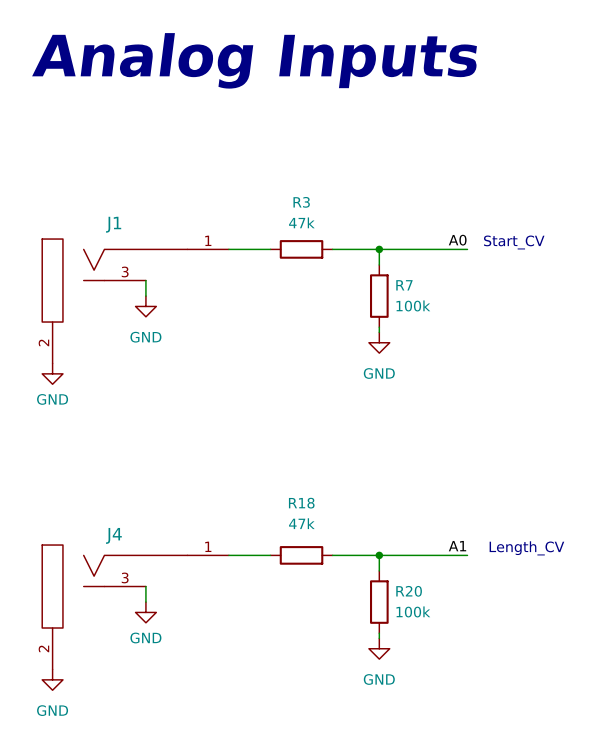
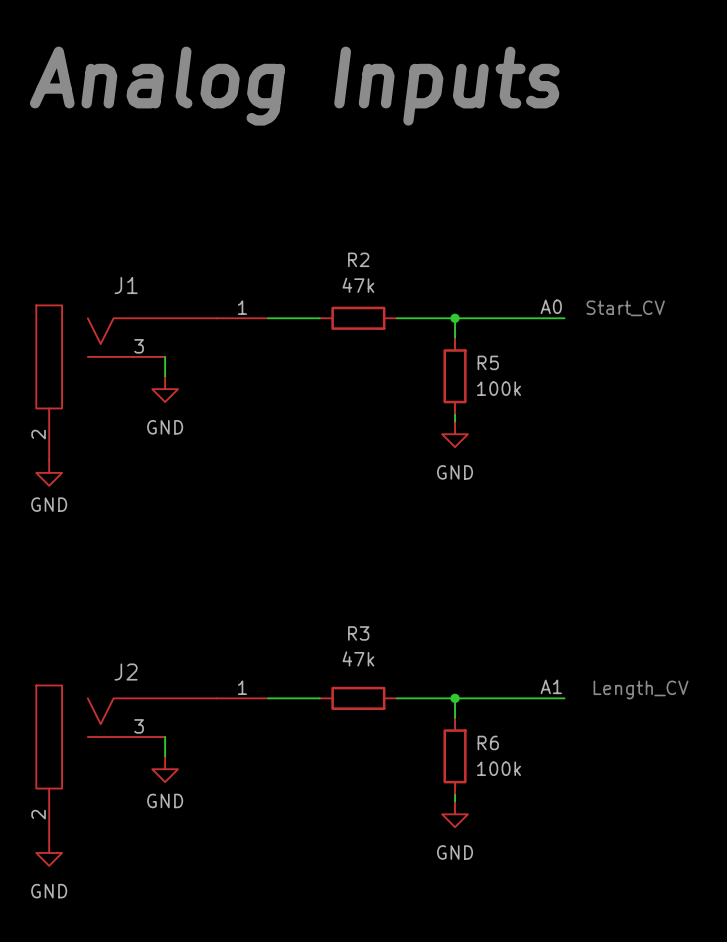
R3 name: R3 (301, 202) -> R2 (358, 259)
R7 name: R7 (404, 285) -> R5 (488, 362)
R18 name: R18 (301, 503) -> R3 (358, 633)
J4 name: J4 (113, 535) -> J2 (126, 672)
R20 name: R20 (409, 591) -> R6 (488, 742)

